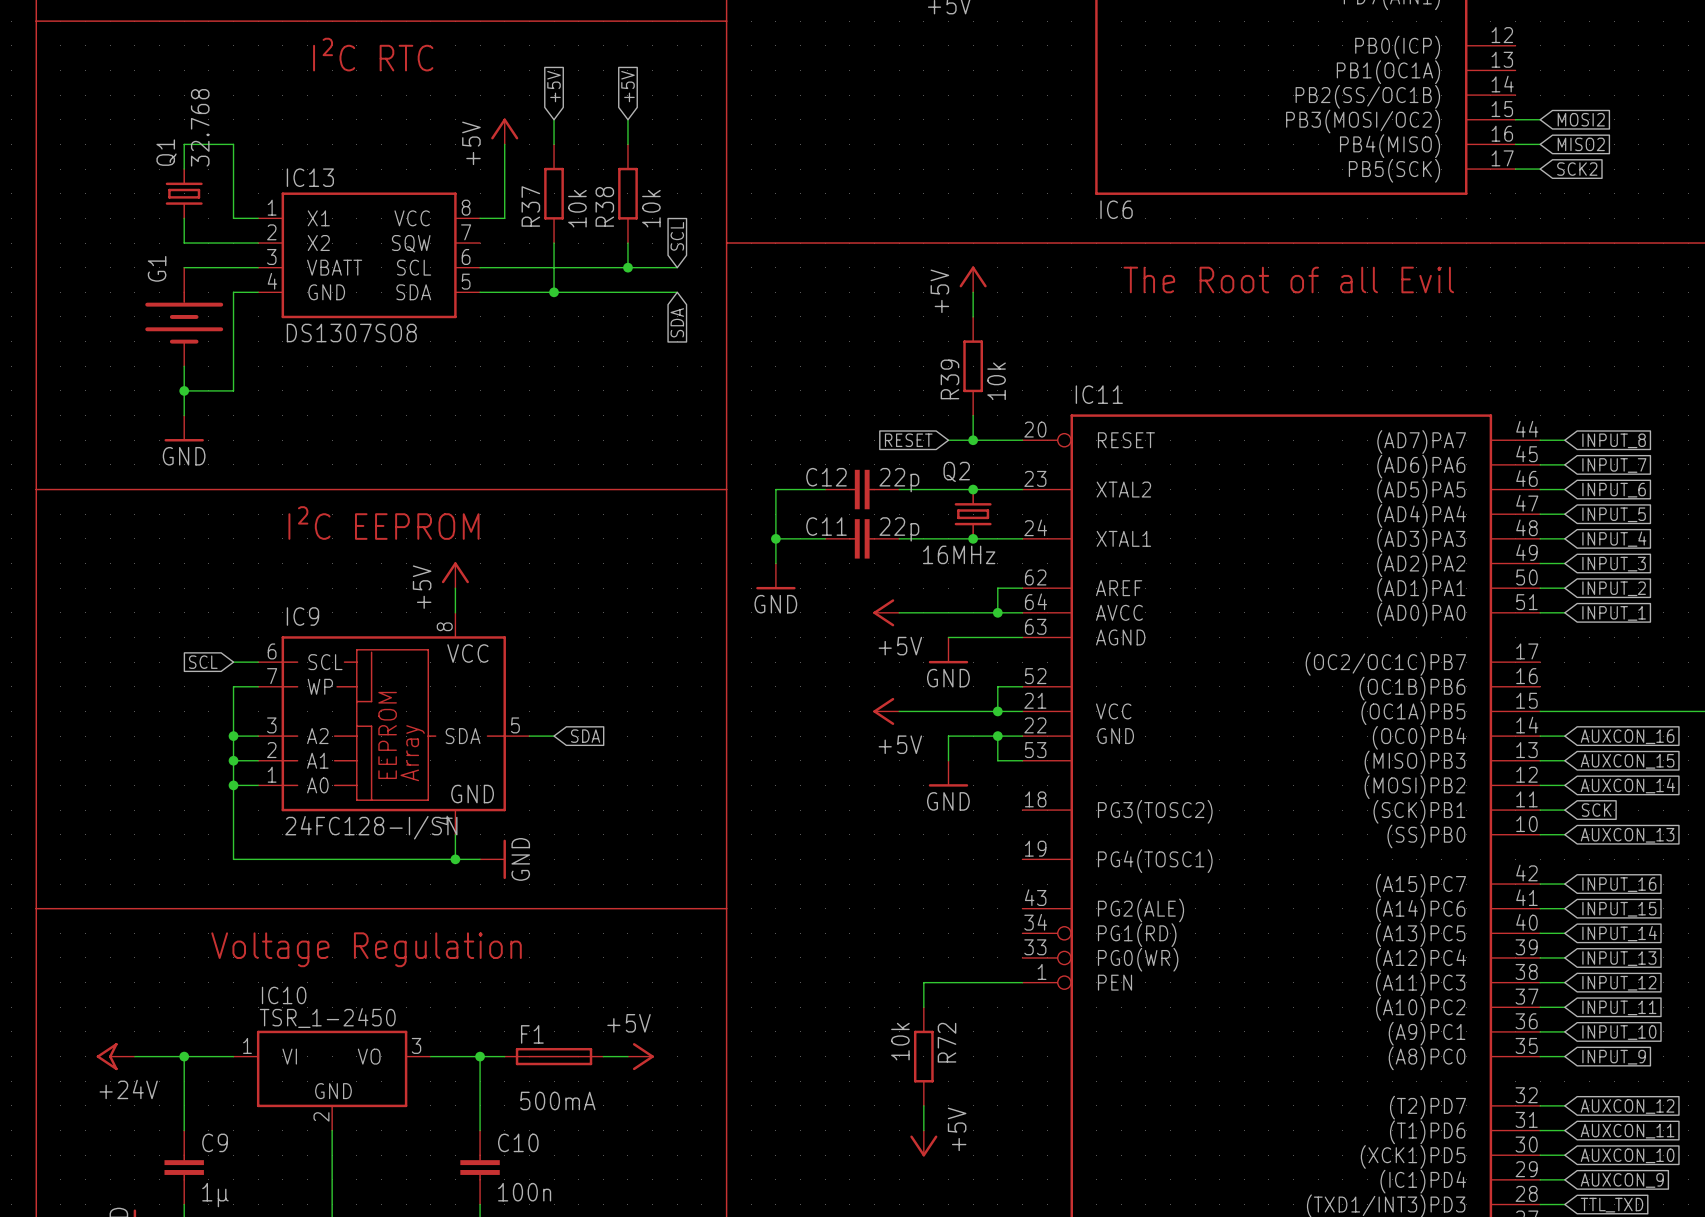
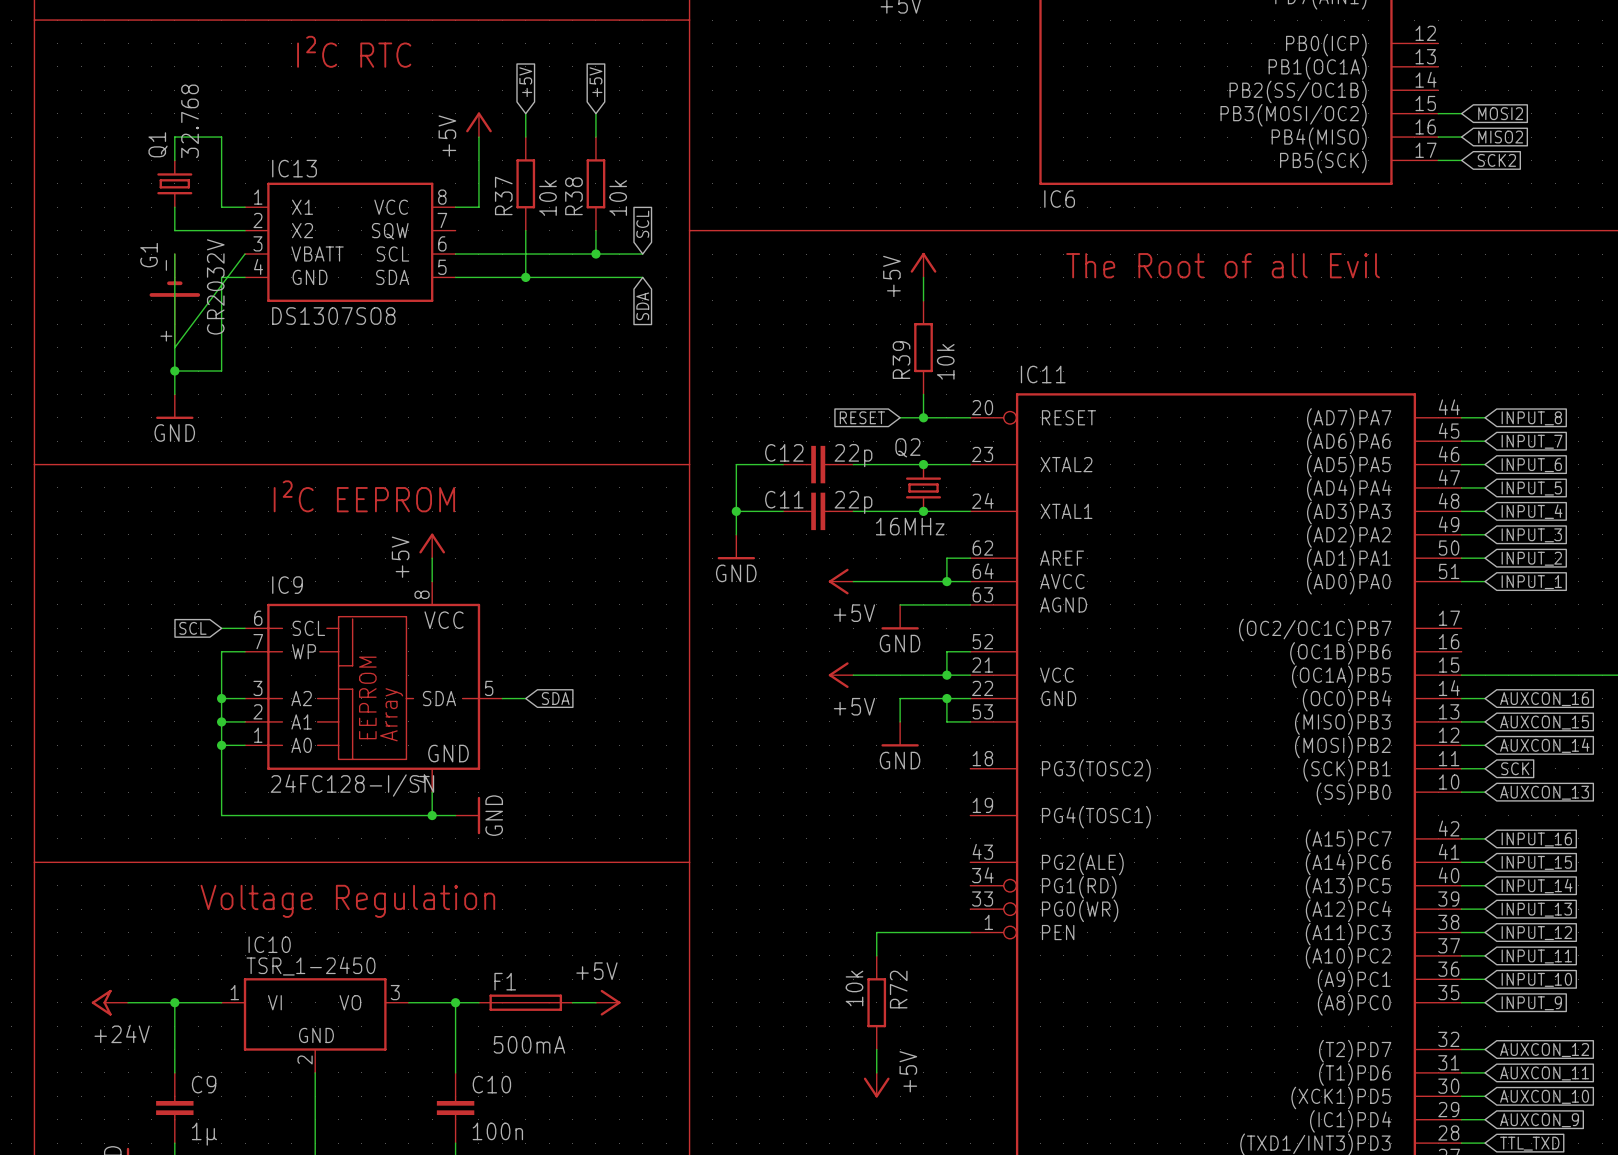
G1 symbol: [145, 267, 224, 367] -> [149, 254, 201, 348]
wire: (184, 267) (258, 267) -> (174, 254) (174, 347) (245, 254)
G1 value: none -> CR2032V (215, 286)

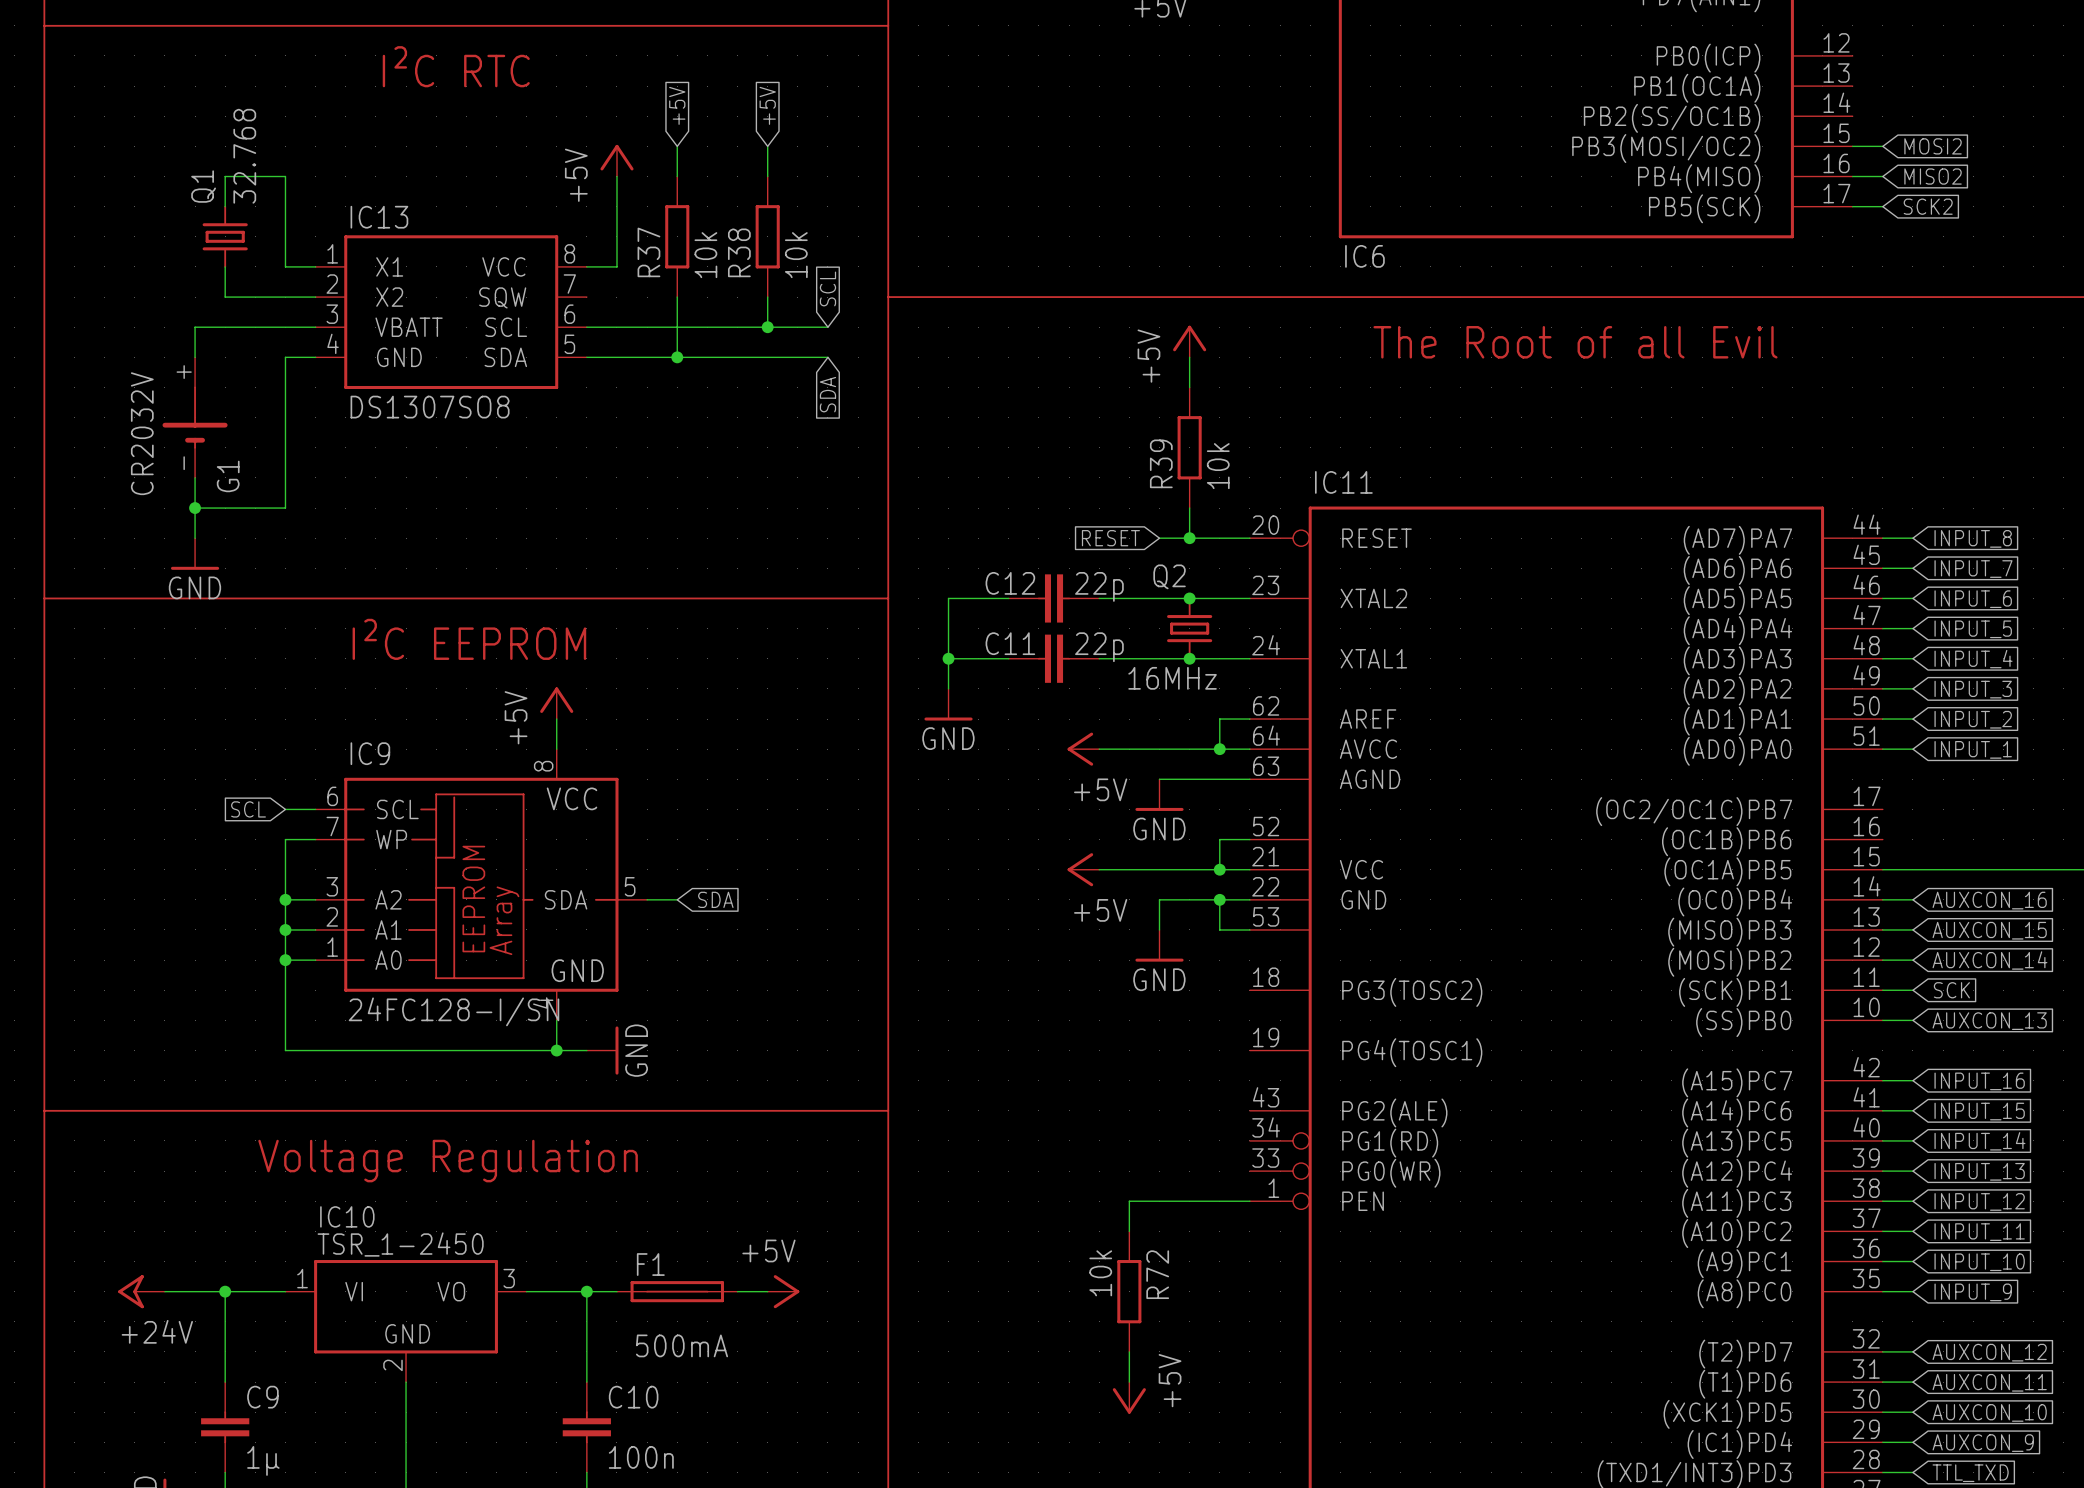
wire: (174, 254) (174, 394) -> none
wire: (245, 254) (174, 347) -> (315, 327) (195, 327) (195, 357)
G1 rotation: 0° (174, 300) -> 180° (195, 417)
wire: none -> (195, 477) (195, 538)
wire: (174, 371) (221, 371) -> (195, 508) (285, 508) (285, 477)
junction position: (174, 371) -> (195, 508)
power symbol position: GND (174, 406) -> GND (195, 554)

